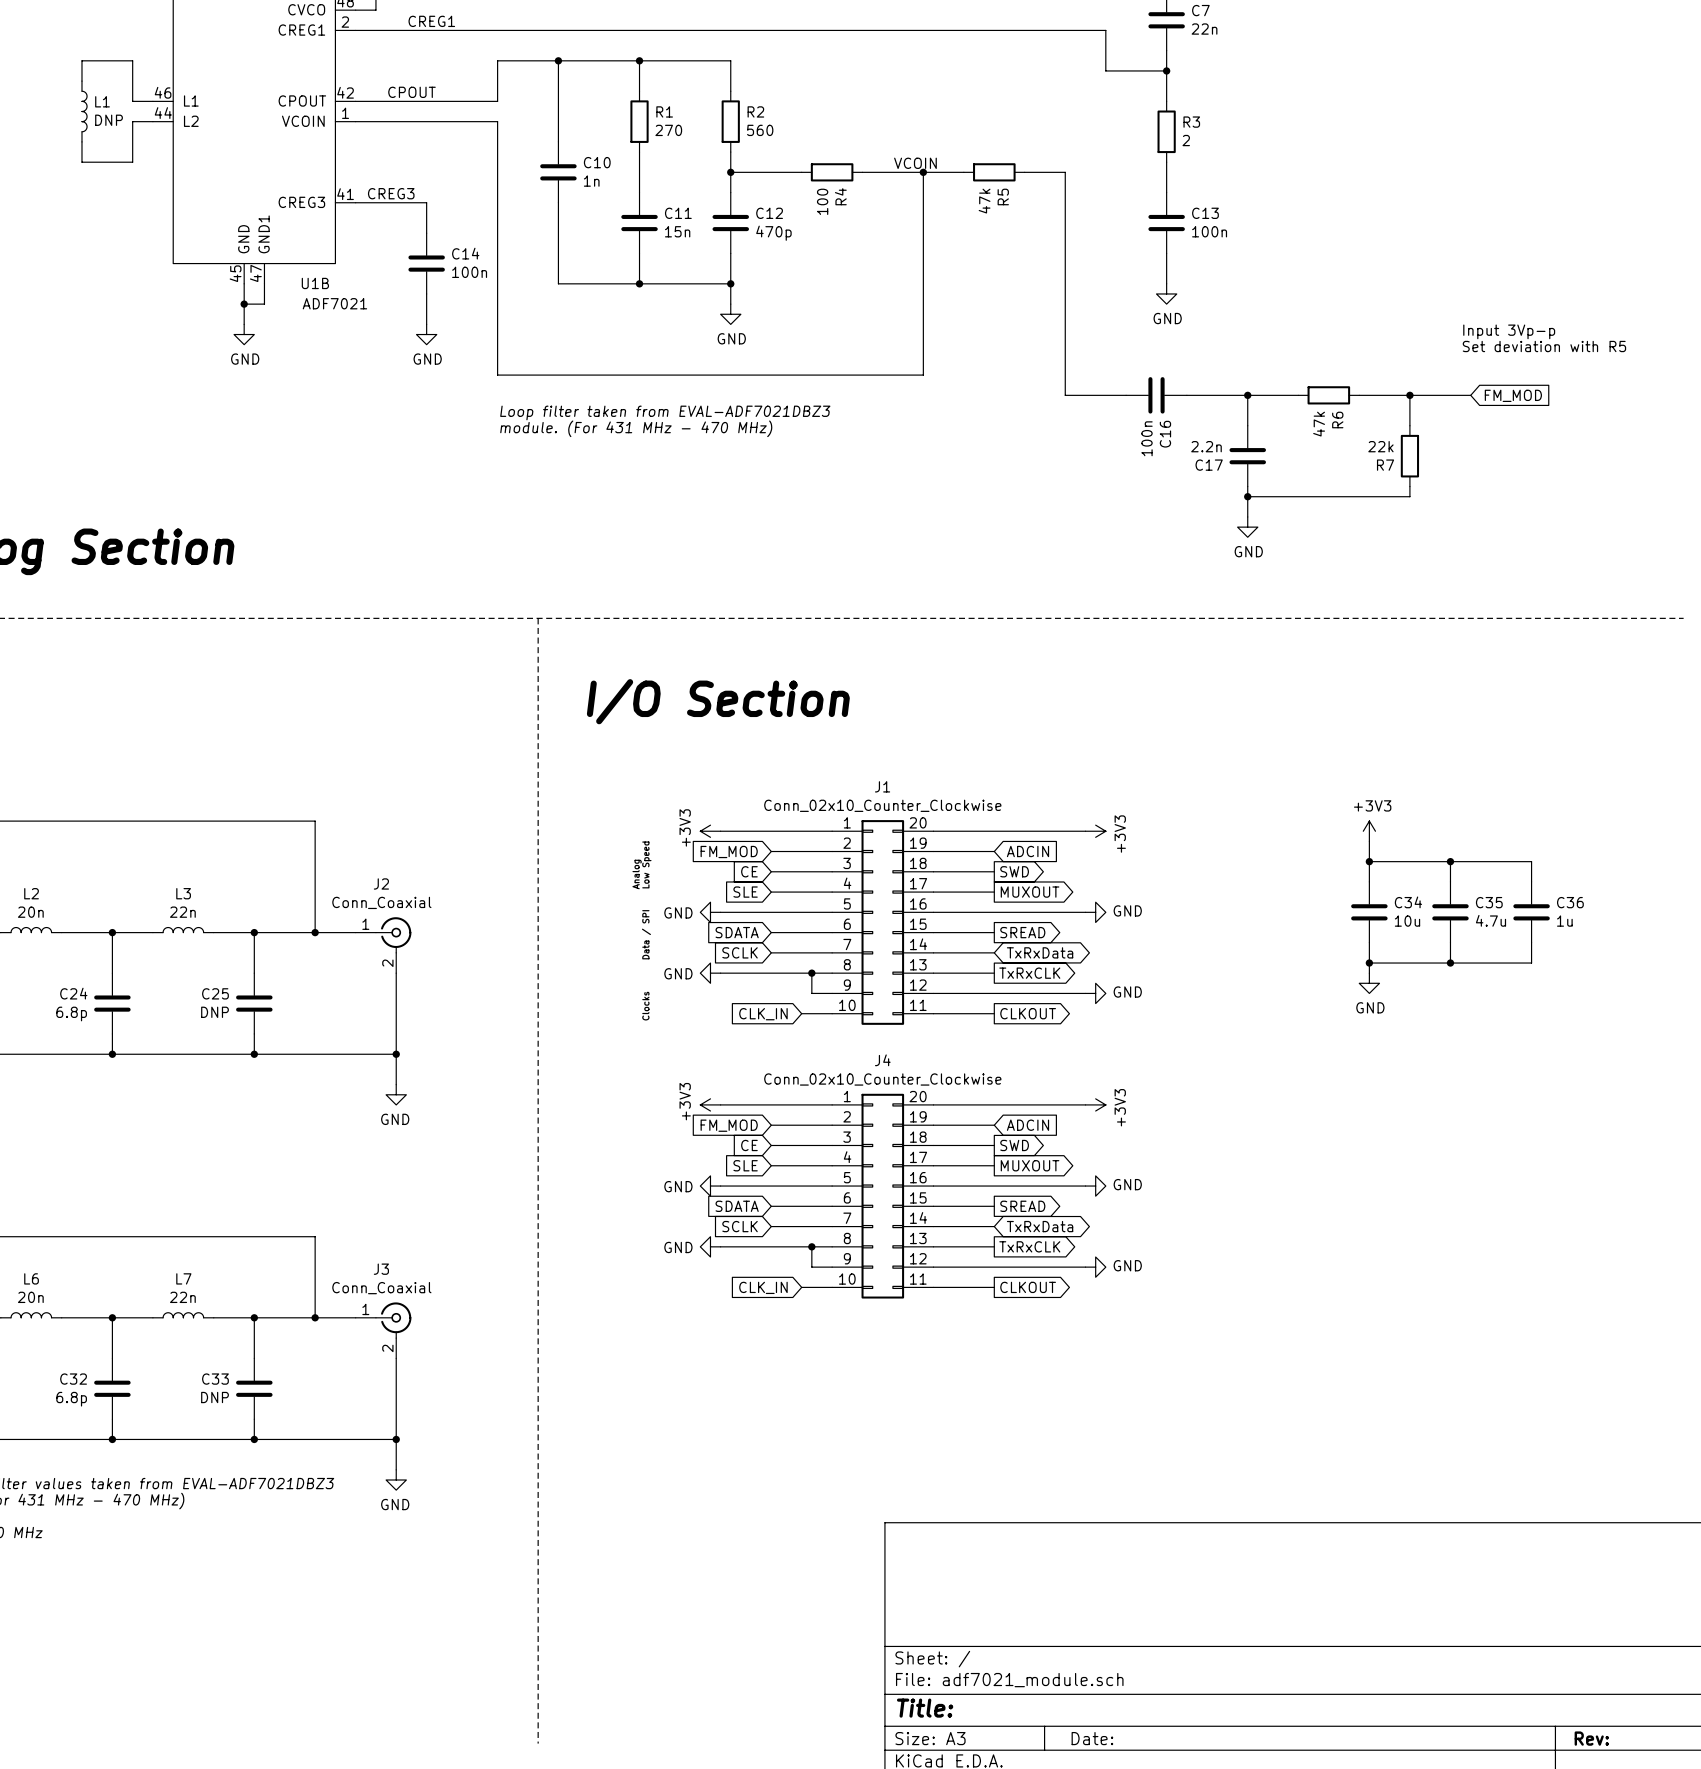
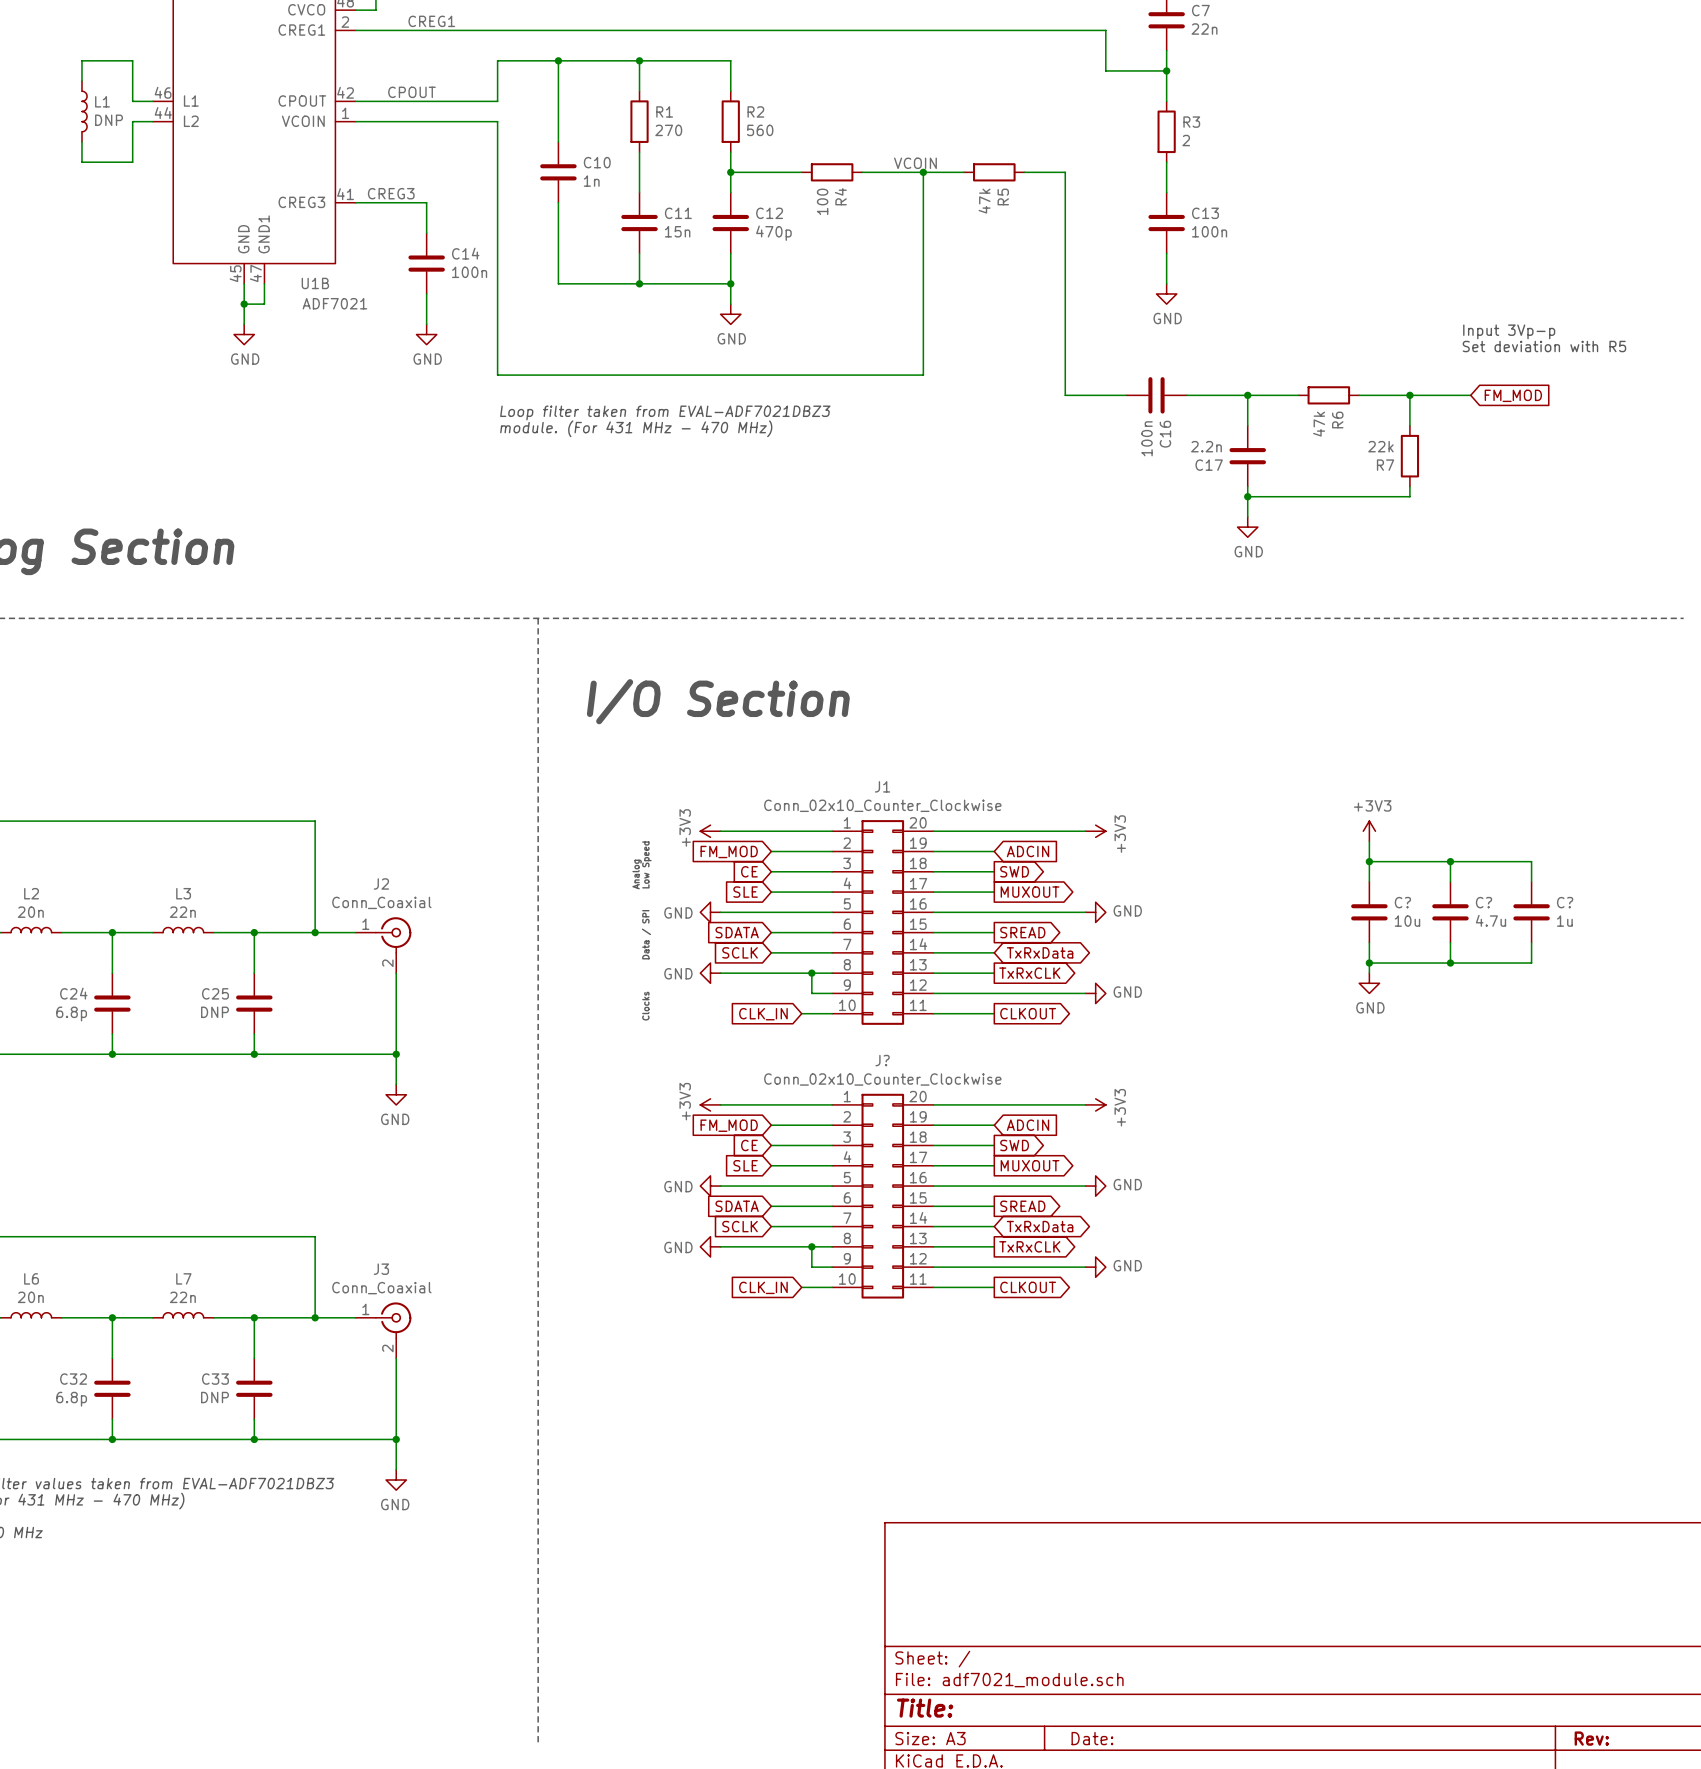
C34 name: C34 (1408, 902) -> C? (1402, 902)
C35 name: C35 (1489, 902) -> C? (1484, 902)
C36 name: C36 (1570, 902) -> C? (1565, 902)
J4 name: J4 (882, 1060) -> J? (882, 1060)

